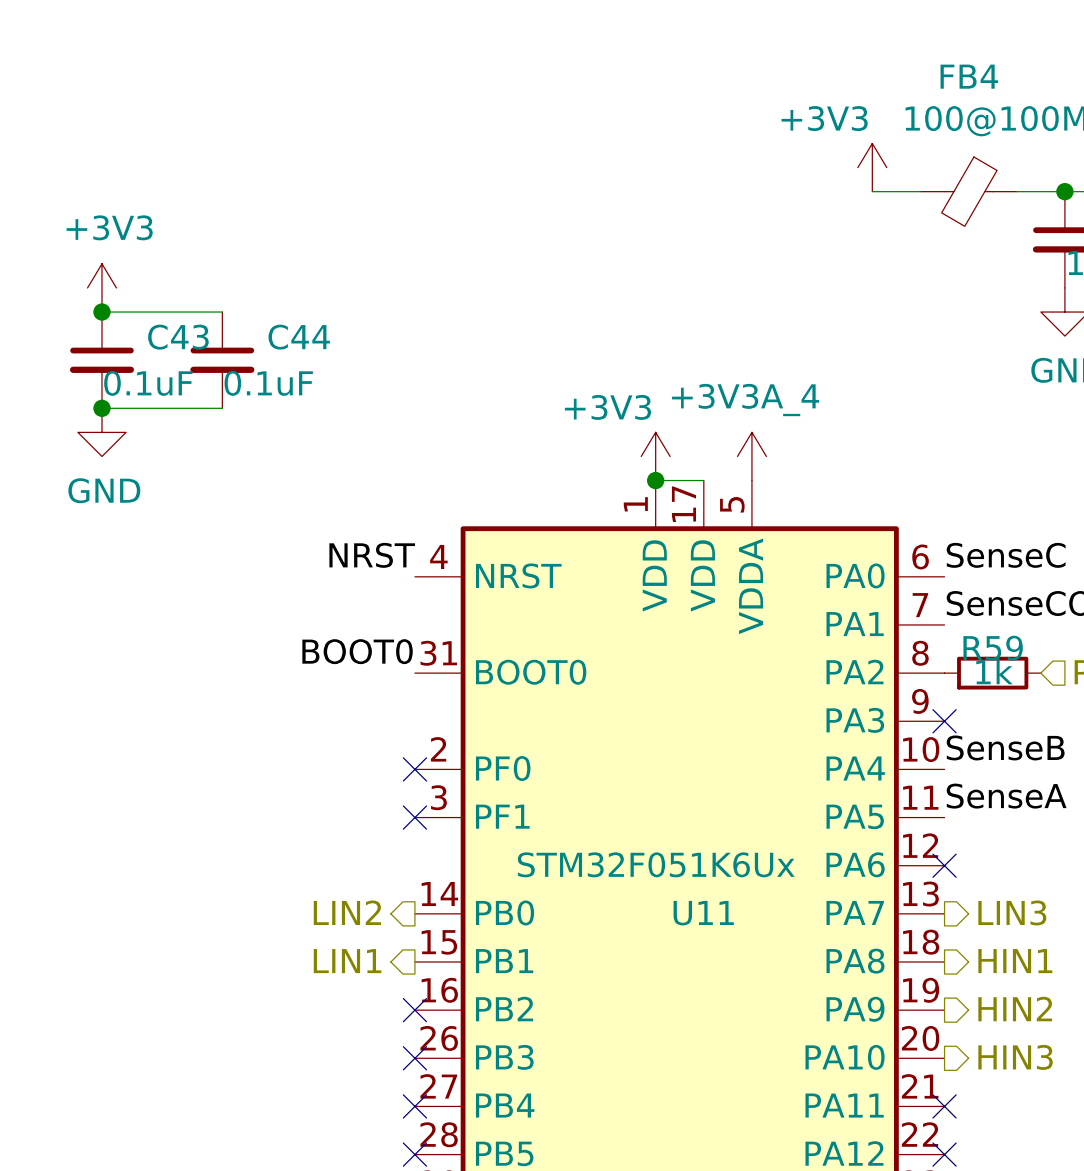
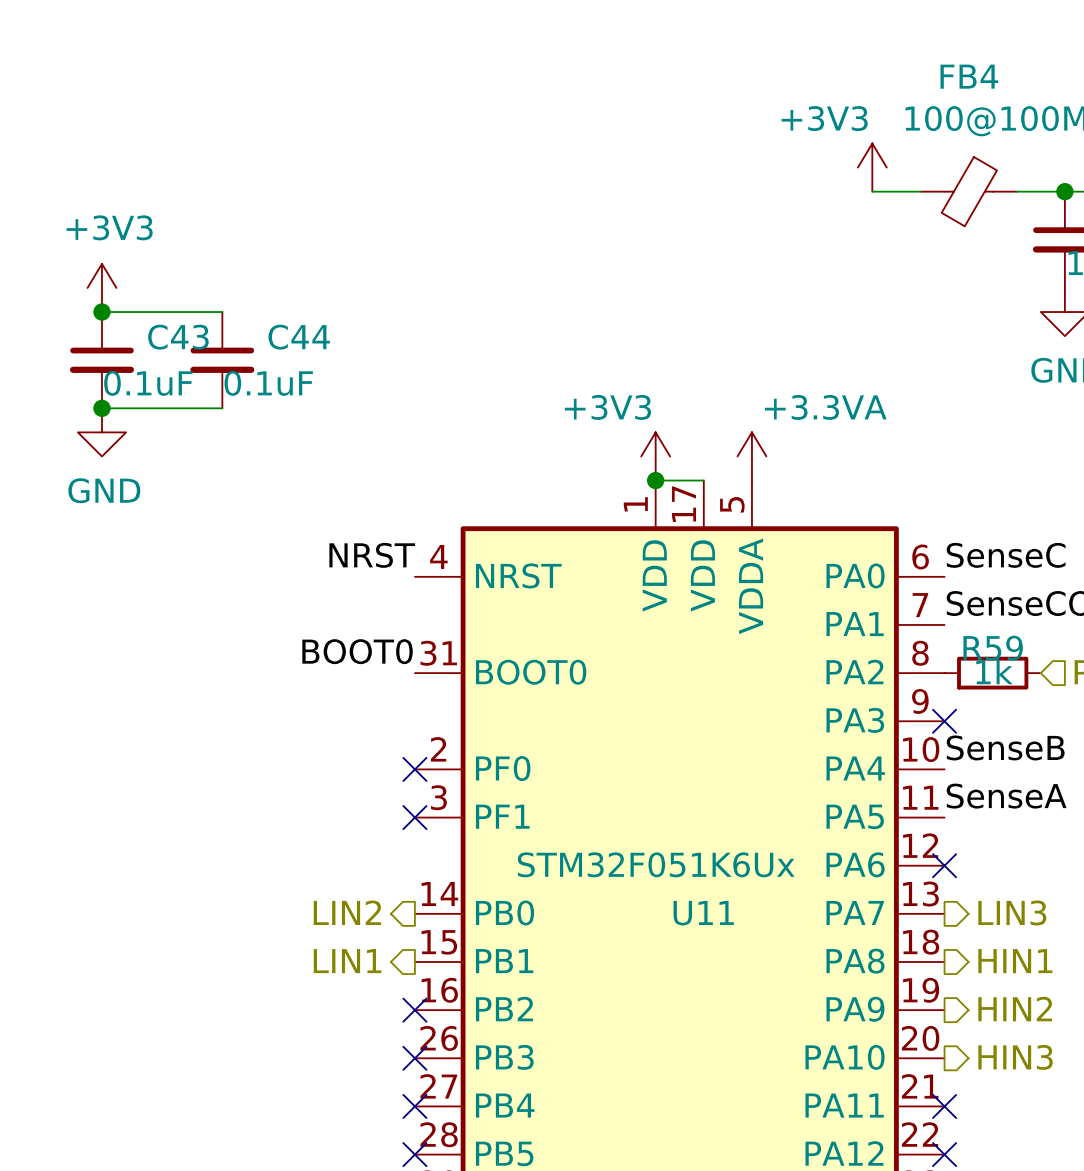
power symbol: +3V3A_4 (751, 456) -> +3.3VA (751, 456)

